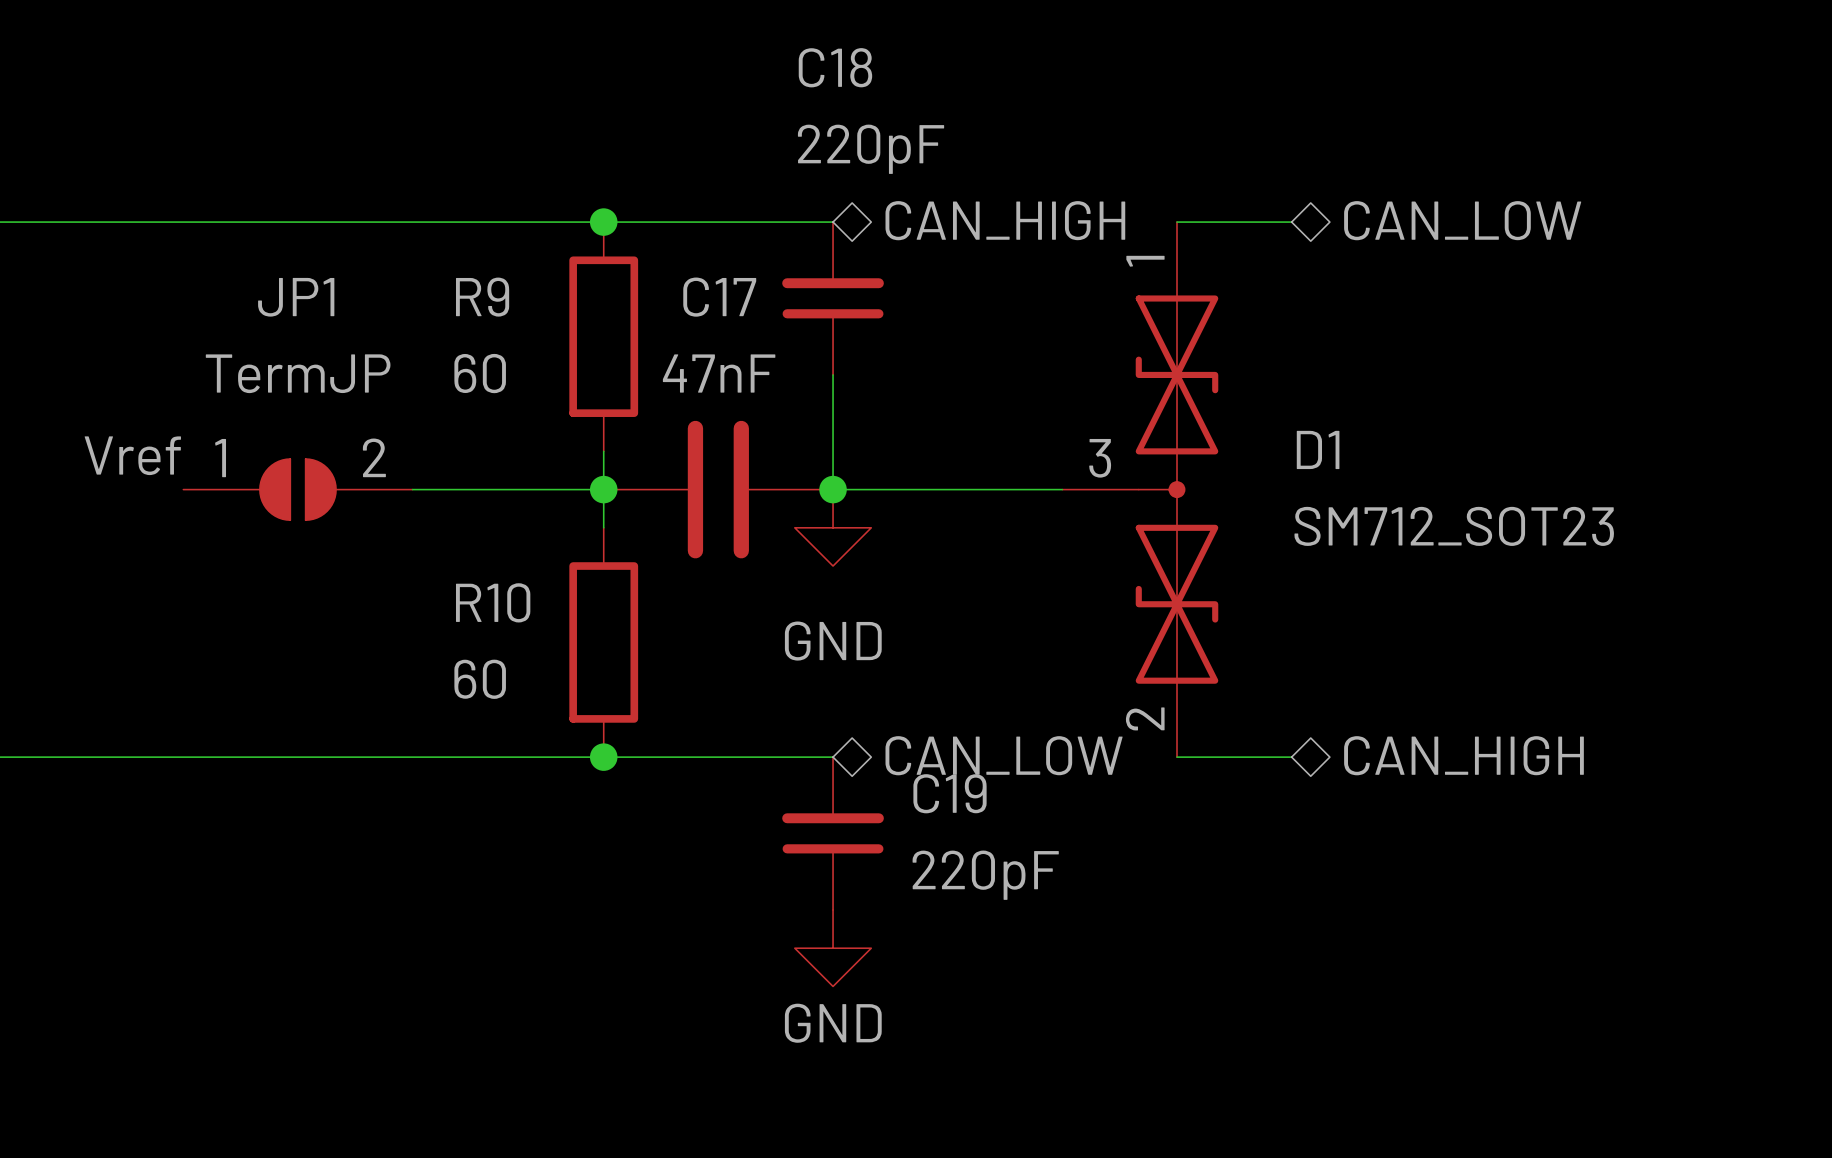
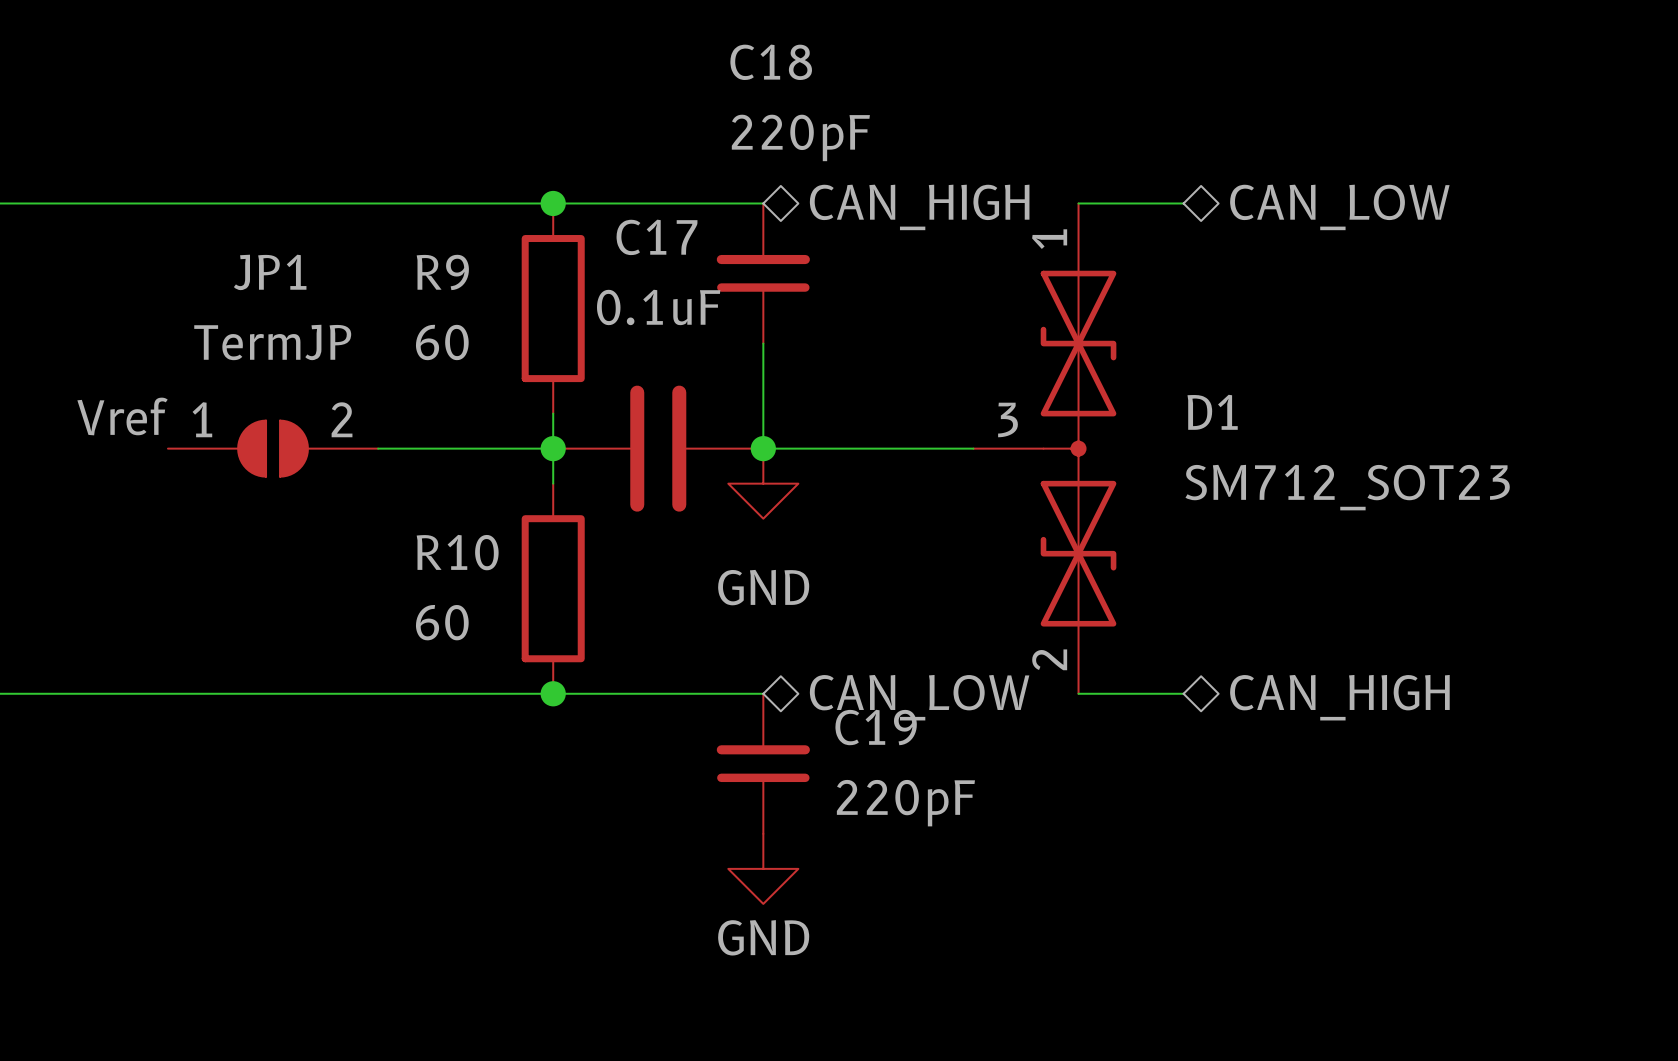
C17 name position: C17 (719, 297) -> C17 (656, 237)
C17 value: 47nF (719, 373) -> 0.1uF (658, 307)

